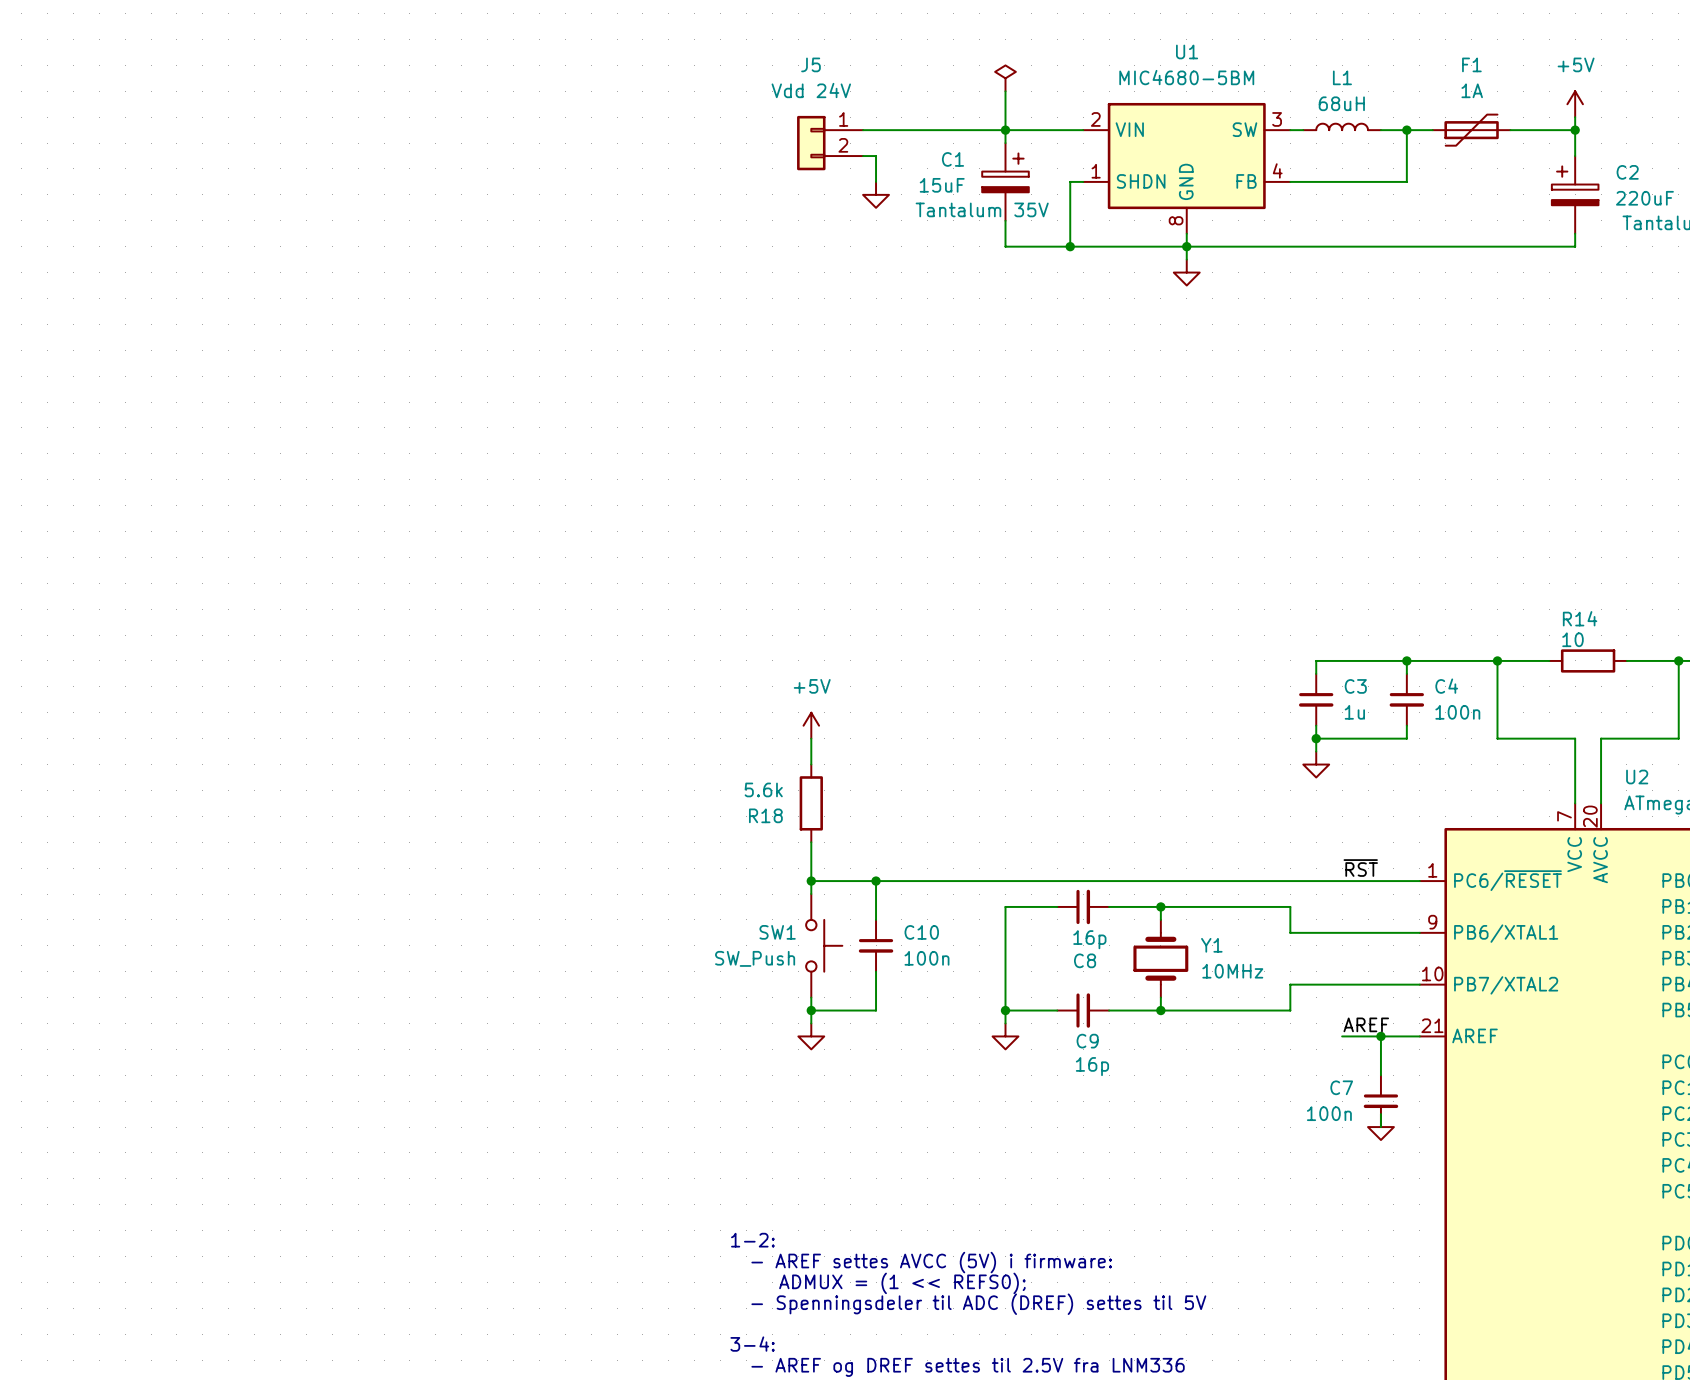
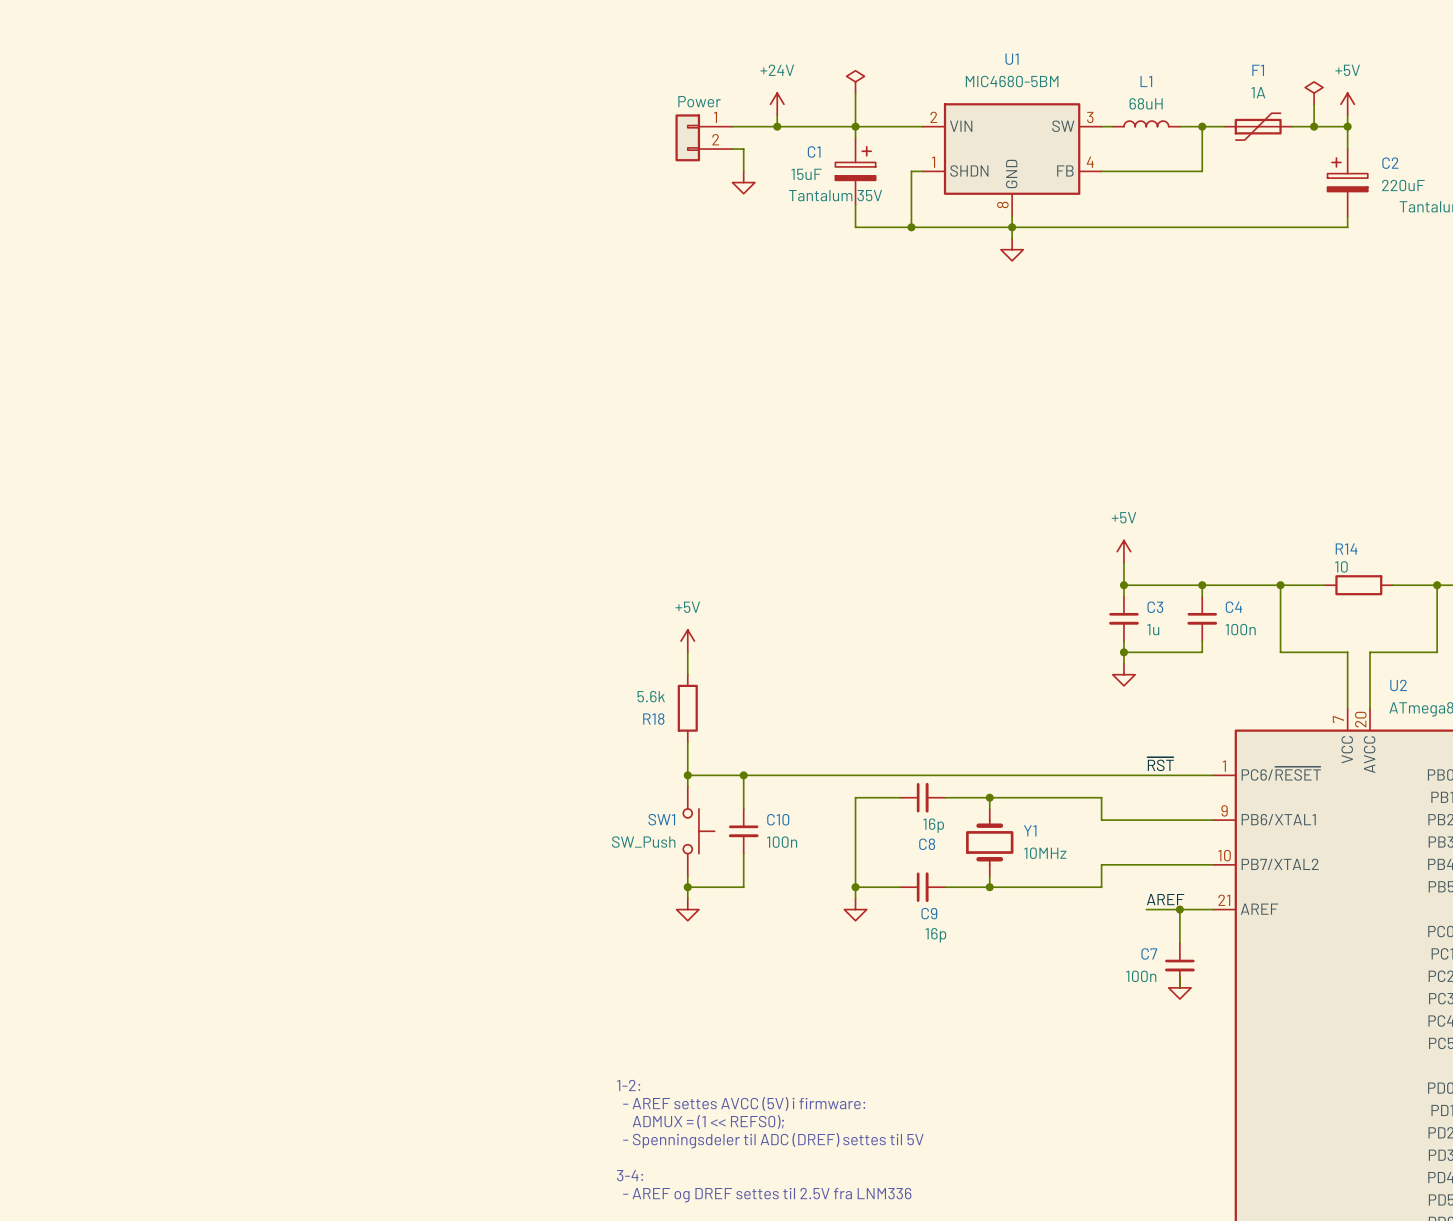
J5 name: J5 (810, 64) -> none
J5 value: Vdd 24V (811, 90) -> Power (699, 101)
power symbol: none -> (1314, 93)
power symbol: none -> +24V (777, 104)
wire: none -> (1314, 104) (1314, 126)
wire: none -> (777, 115) (777, 126)
junction: none -> (777, 126)
junction: none -> (1314, 126)
power symbol: none -> +5V (1123, 551)
wire: none -> (1123, 562) (1123, 585)
junction: none -> (1123, 585)

